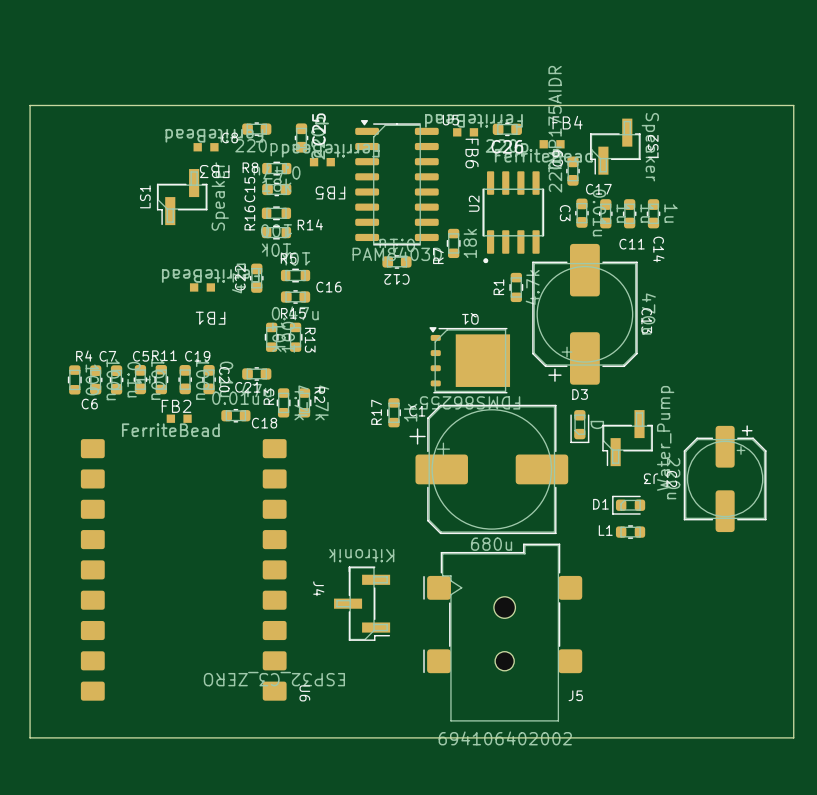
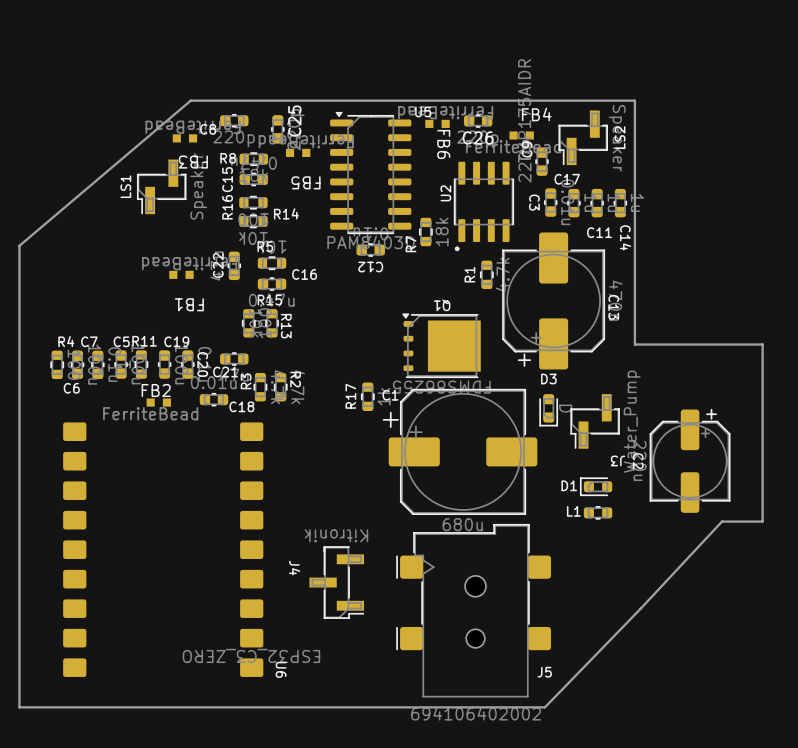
board edge: (30, 105) (793, 105) (793, 737) (30, 737) (30, 105) -> (190, 100) (19, 245) (19, 707) (544, 707) (721, 521) (762, 521) (762, 344) (634, 344) (634, 100) (190, 100)

